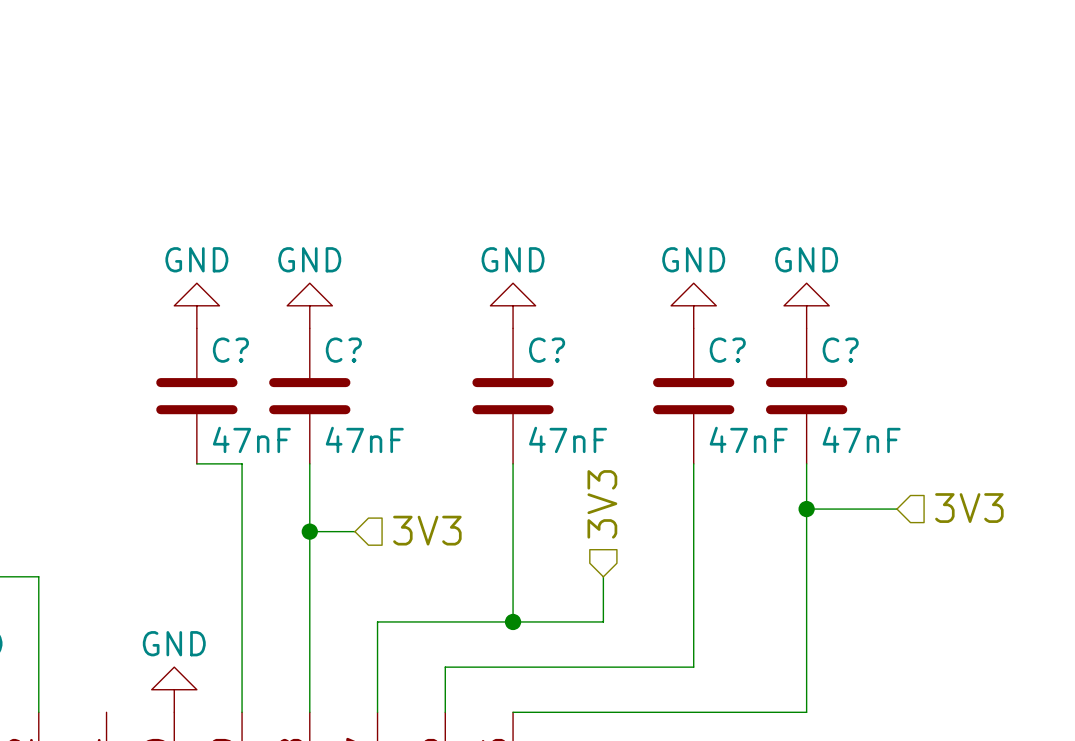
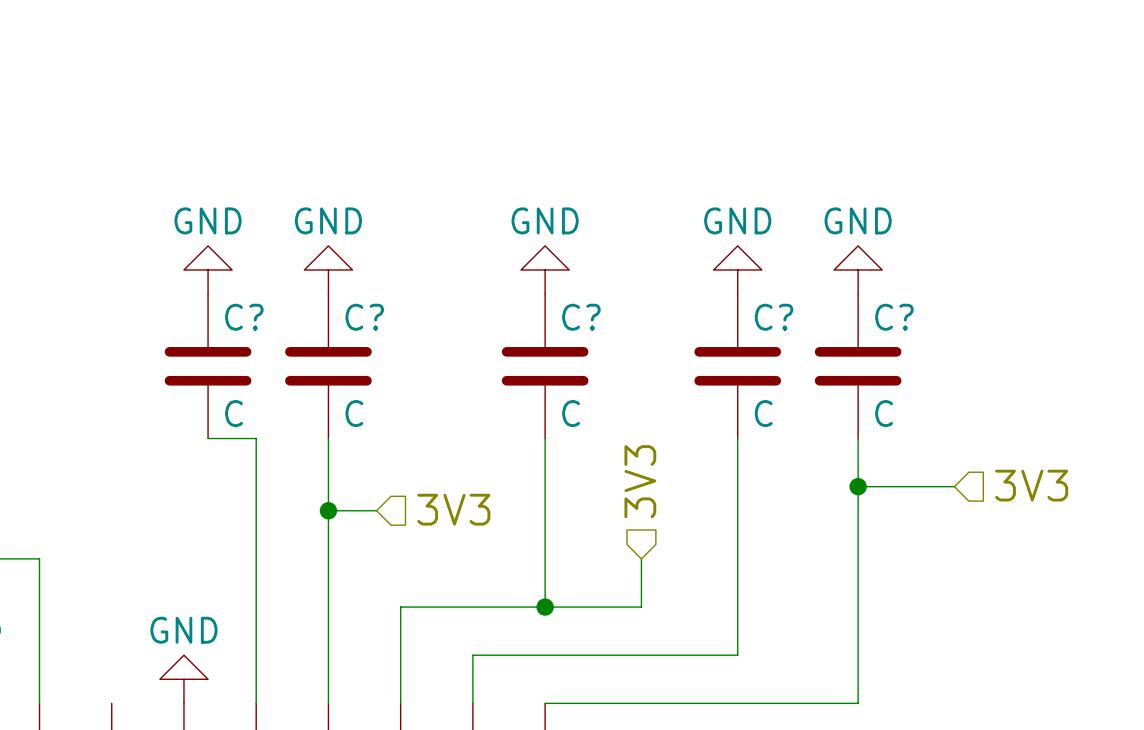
C? value: 47nF (251, 439) -> C (234, 413)
C? value: 47nF (364, 439) -> C (354, 413)
C? value: 47nF (568, 439) -> C (571, 413)
C? value: 47nF (748, 439) -> C (763, 413)
C? value: 47nF (861, 439) -> C (884, 413)

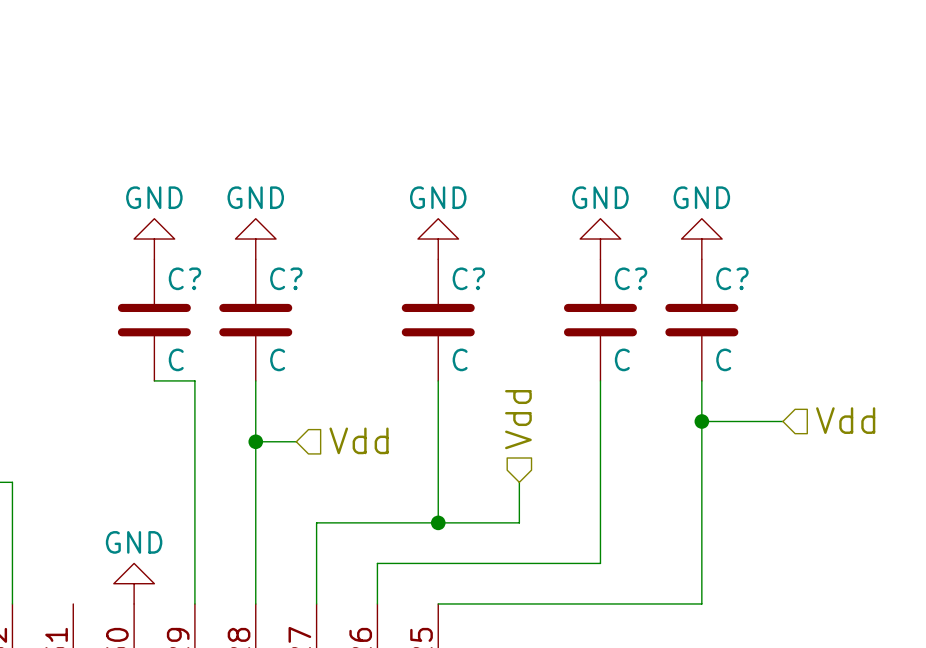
hierarchical label: 3V3 (640, 481) -> Vdd (518, 419)
hierarchical label: 3V3 (1031, 485) -> Vdd (845, 420)
hierarchical label: 3V3 (453, 509) -> Vdd (359, 440)

